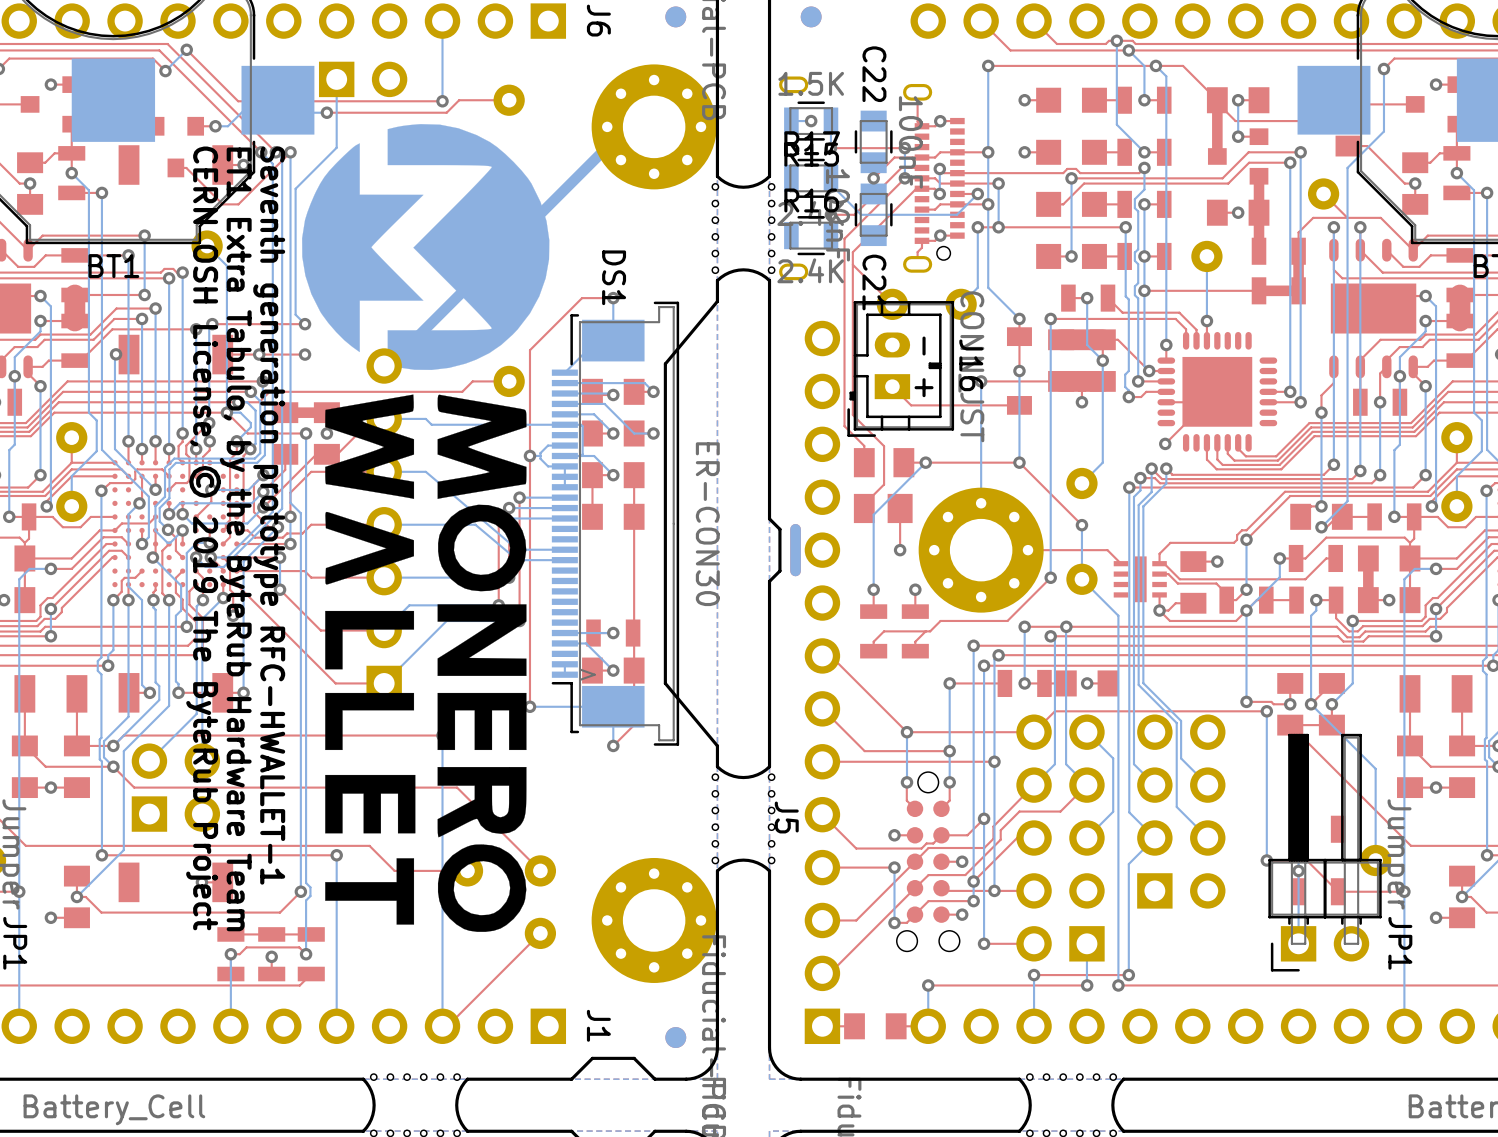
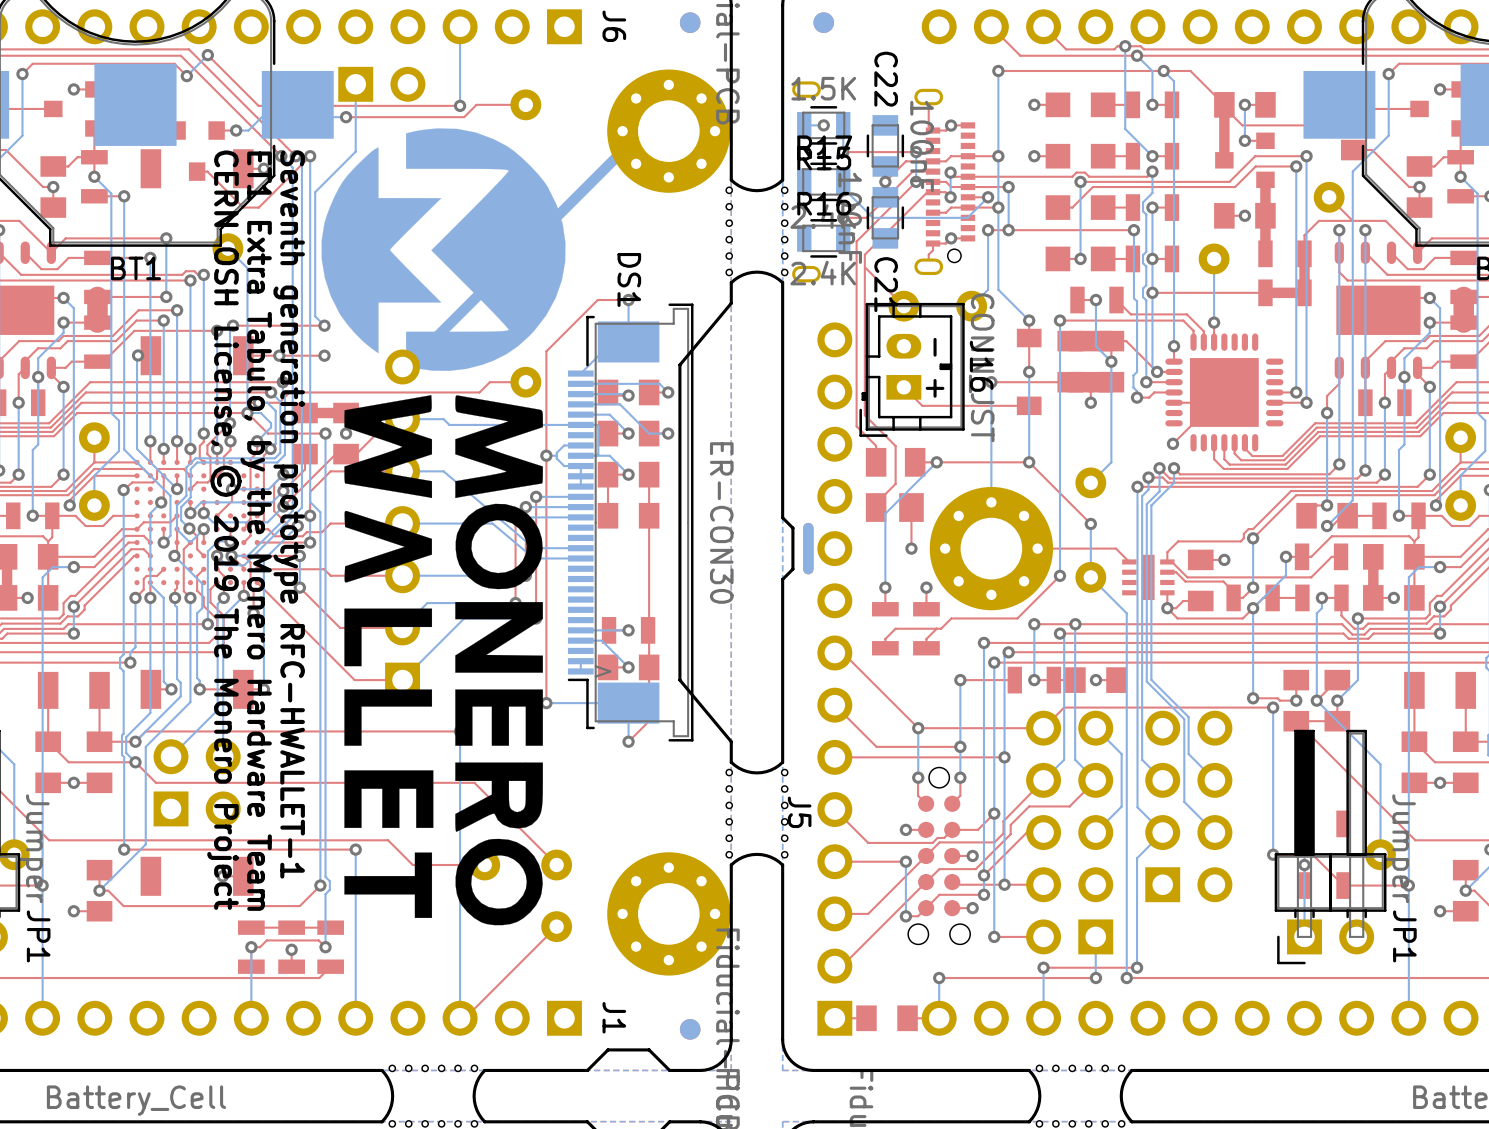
text: CERN OSH License, © 2019 The ByteRub Project (203, 538) -> CERN OSH License, © 2019 The Monero Project (224, 530)
text: ET1 Extra Tabulo, by the ByteRub Hardware Team (235, 539) -> ET1 Extra Tabulo, by the Monero Hardware Team (256, 531)

